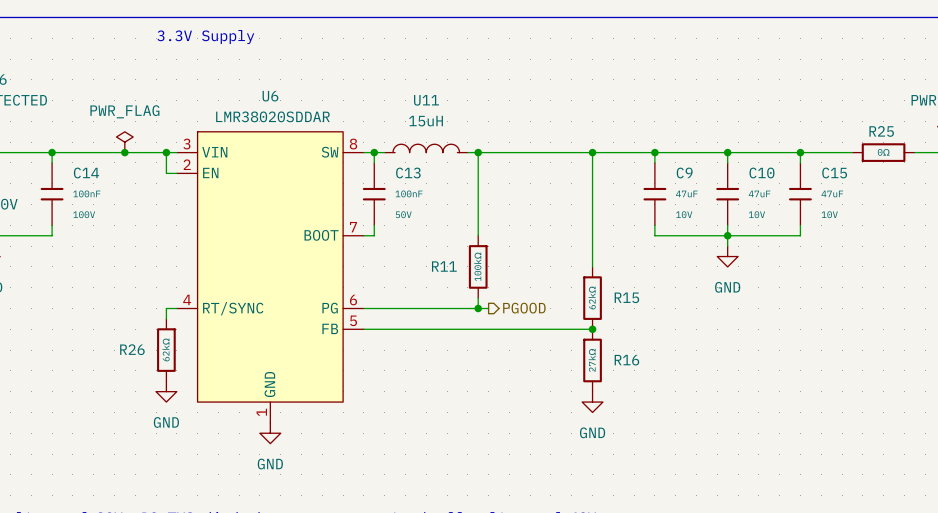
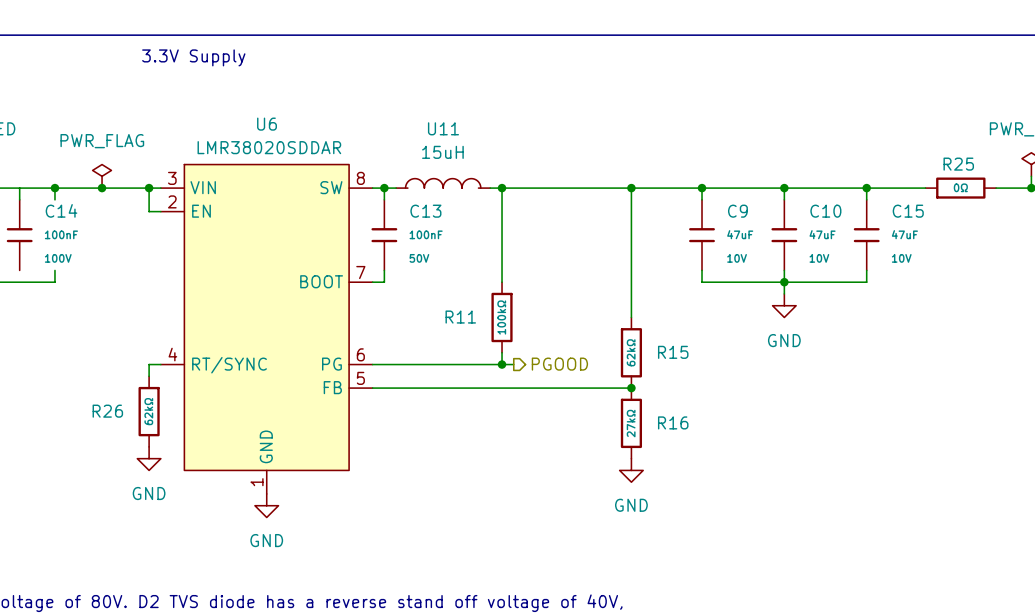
junction position: (52, 152) -> (54, 188)
wire: none -> (54, 188) (54, 199)
wire: (52, 225) (52, 235) -> (54, 270) (54, 282) (19, 282)

